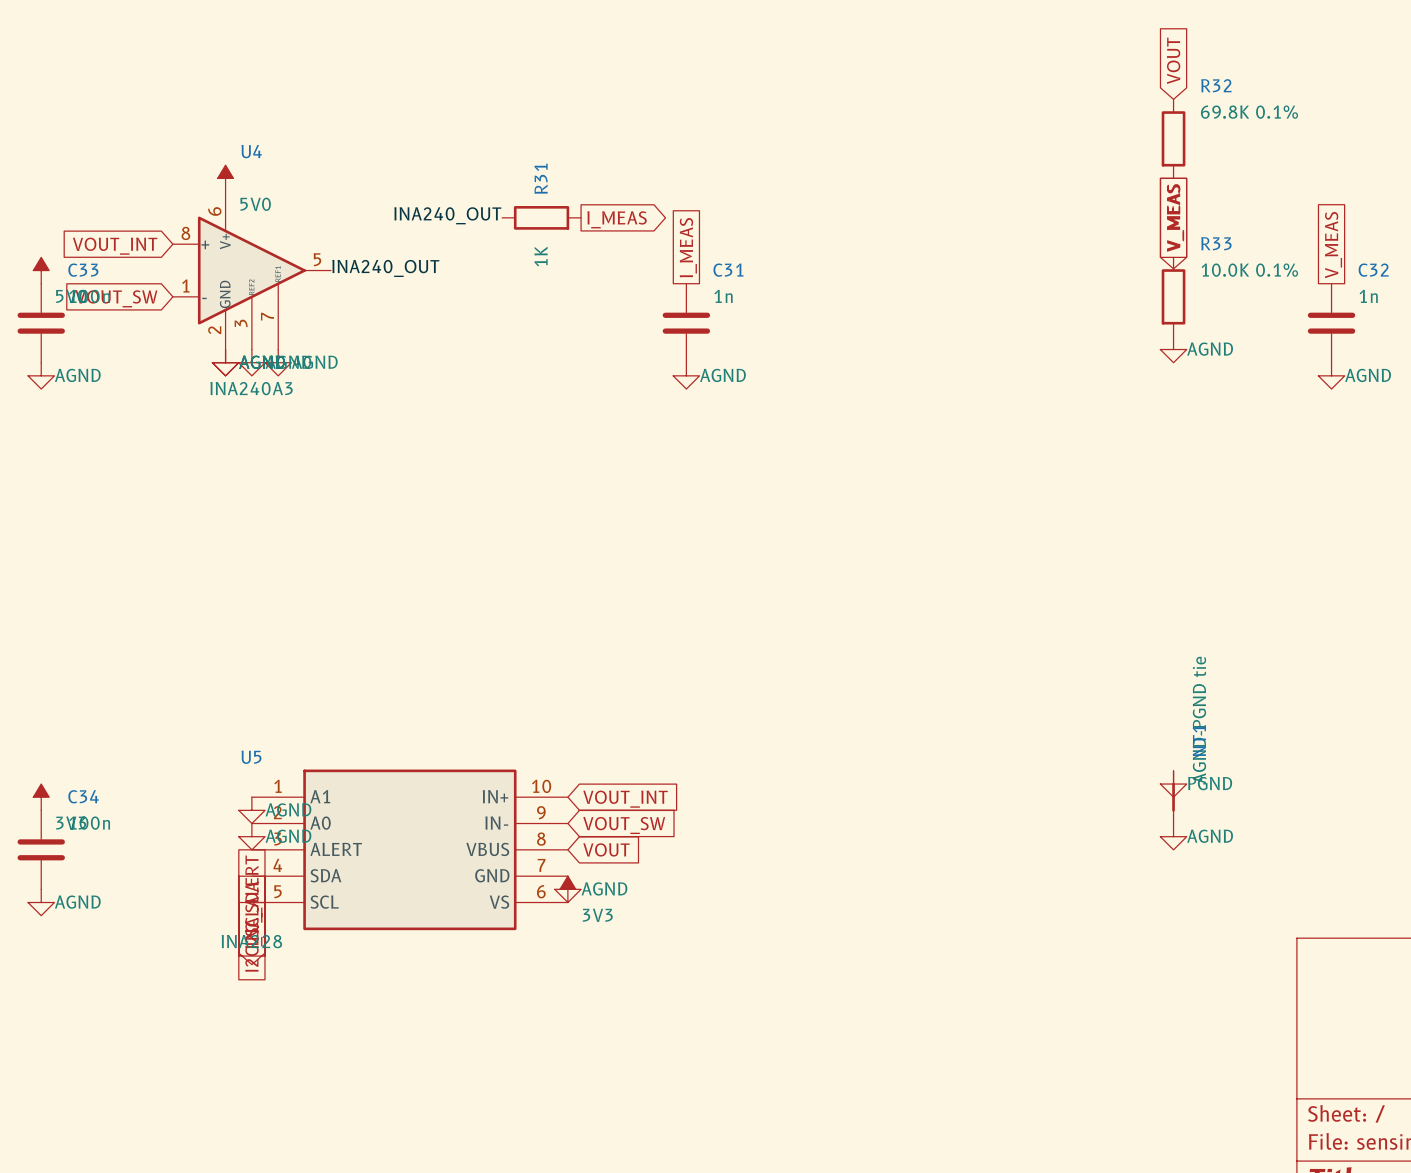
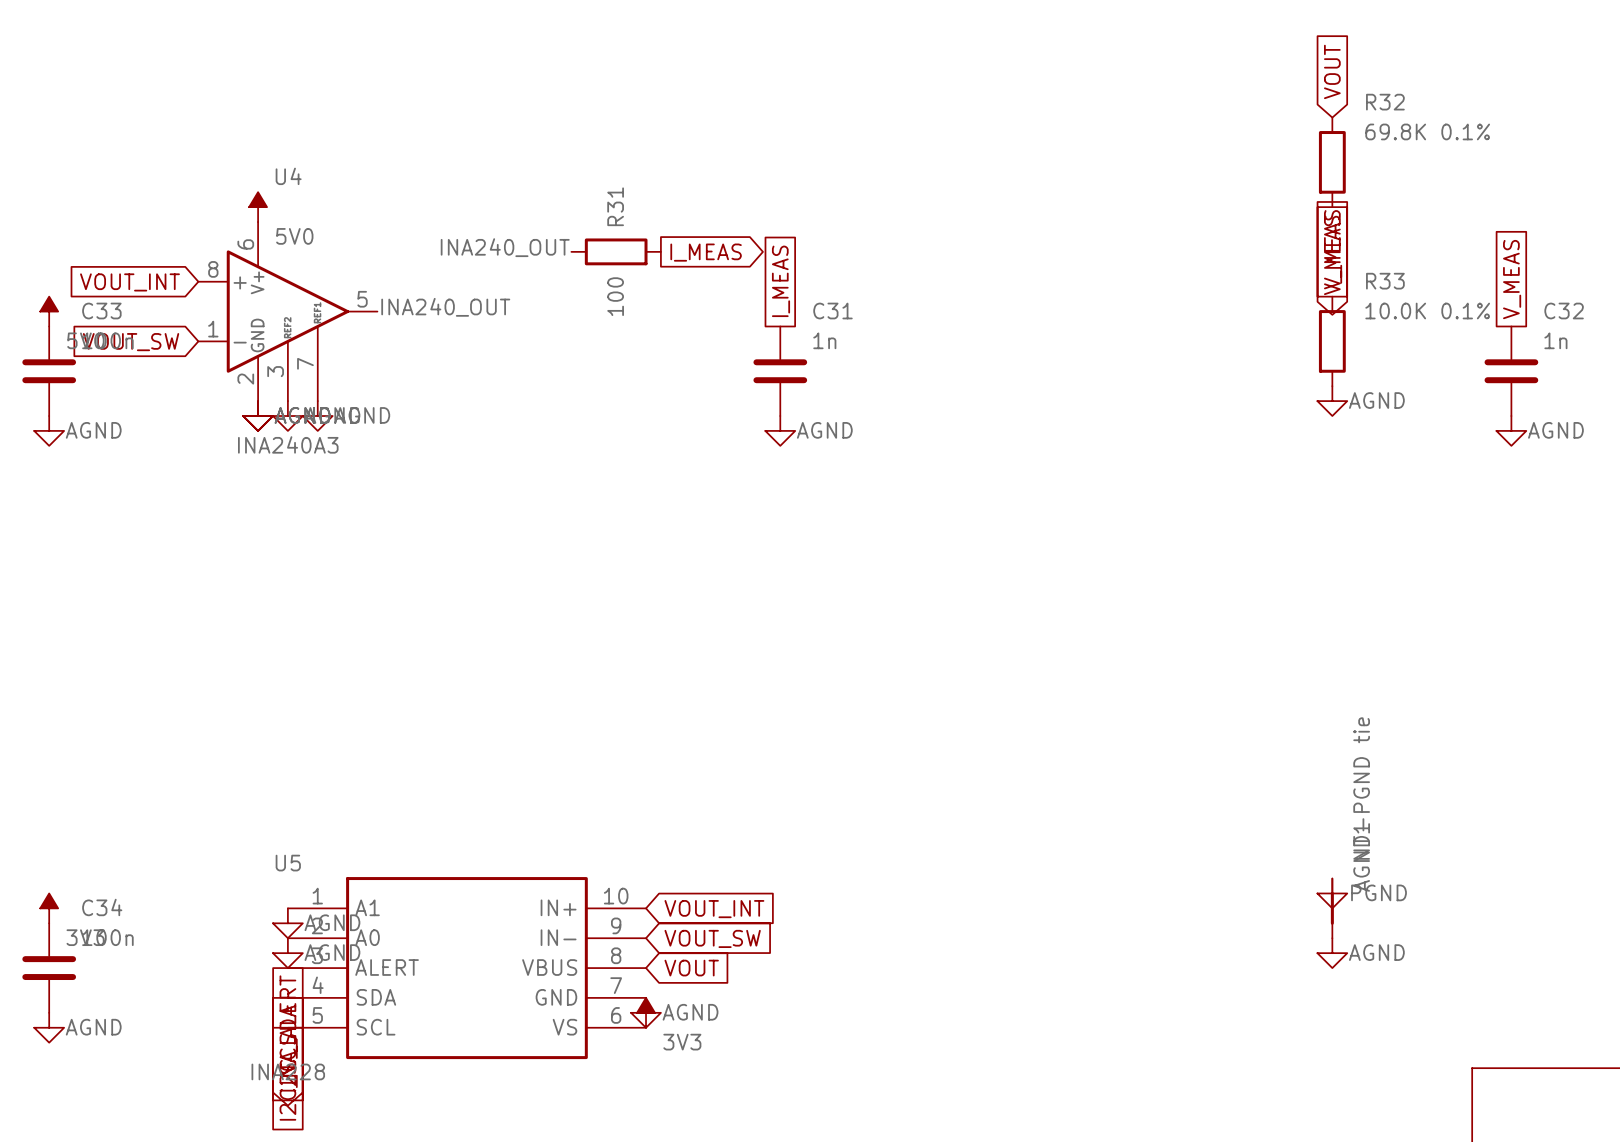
R31 value: 1K (541, 256) -> 100 (615, 296)

